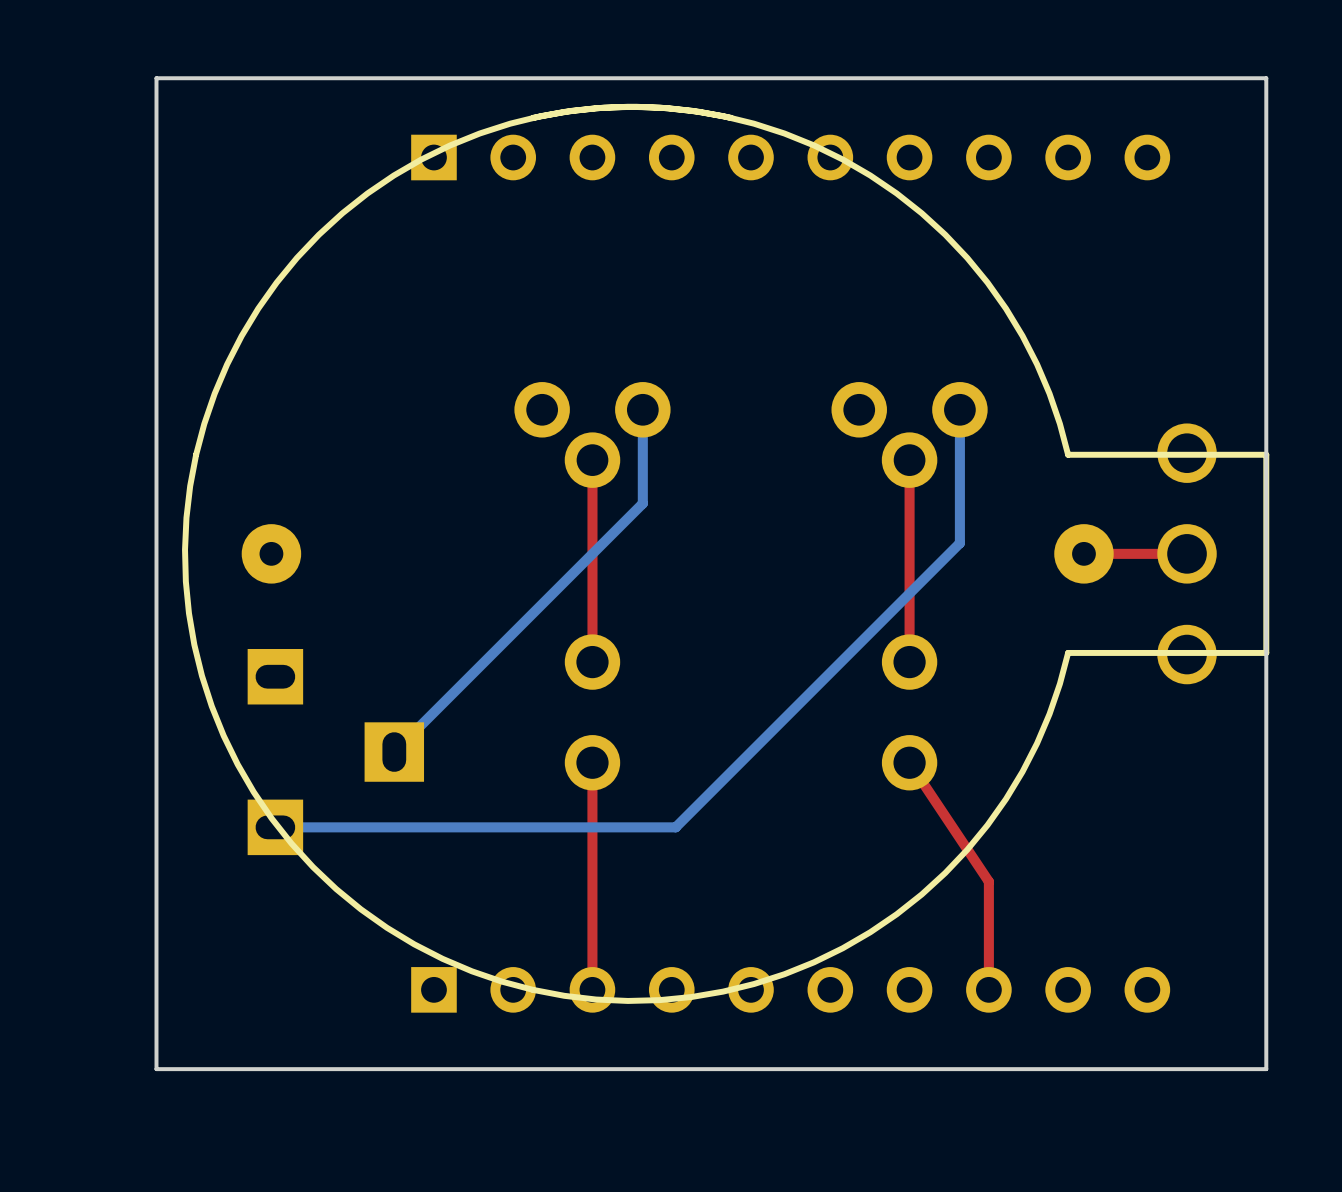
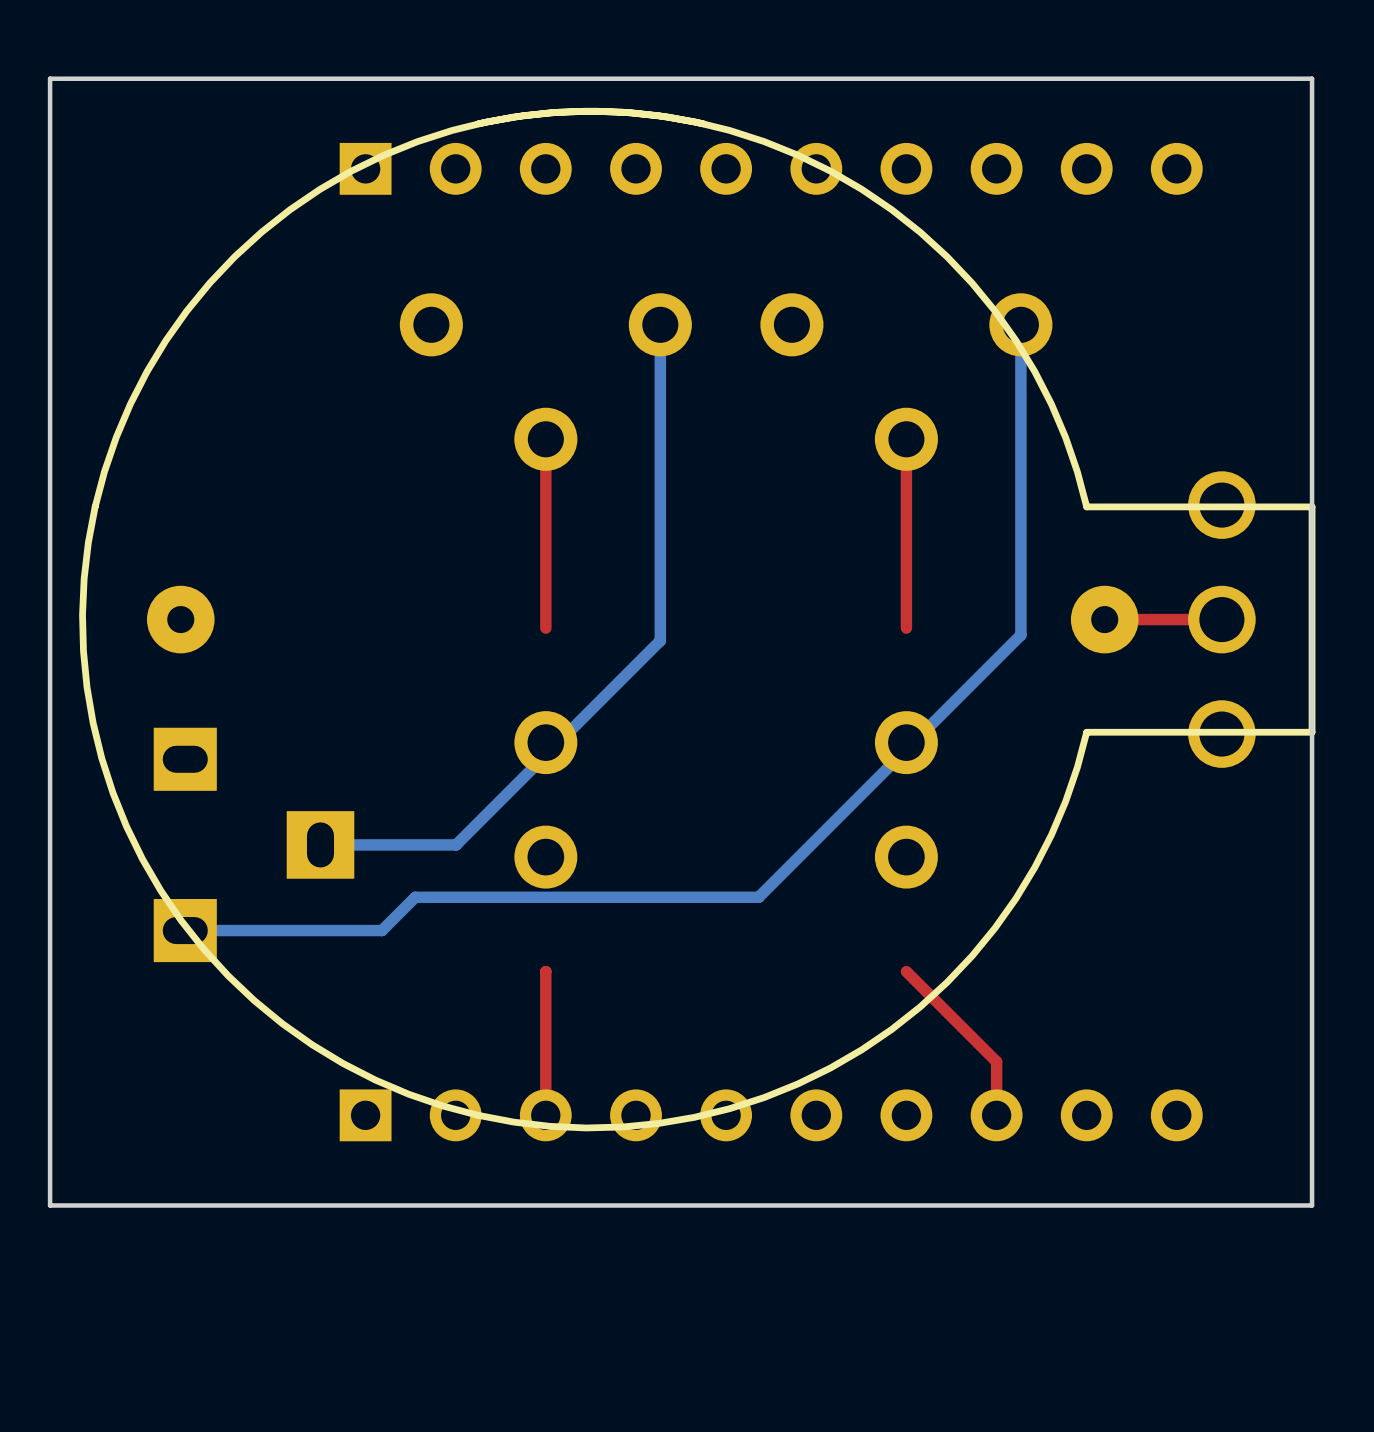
part: none -> (545, 382)
part: none -> (906, 382)
bottom track: (642, 409) (642, 503) (394, 752) -> (660, 324) (660, 640) (456, 844) (320, 844)
bottom track: (959, 409) (959, 543) (675, 827) (448, 827) -> (1020, 324) (1020, 635) (758, 897) (415, 897) (381, 930)
top track: none -> (545, 467) (545, 512)
top track: none -> (906, 467) (906, 512)
part: (592, 434) -> none
part: (909, 434) -> none
top track: (592, 561) (592, 662) -> none
top track: (909, 561) (909, 662) -> none
top track: (592, 762) (592, 863) -> none
top track: (909, 762) (988, 881) (988, 942) -> (906, 971) (996, 1061)

